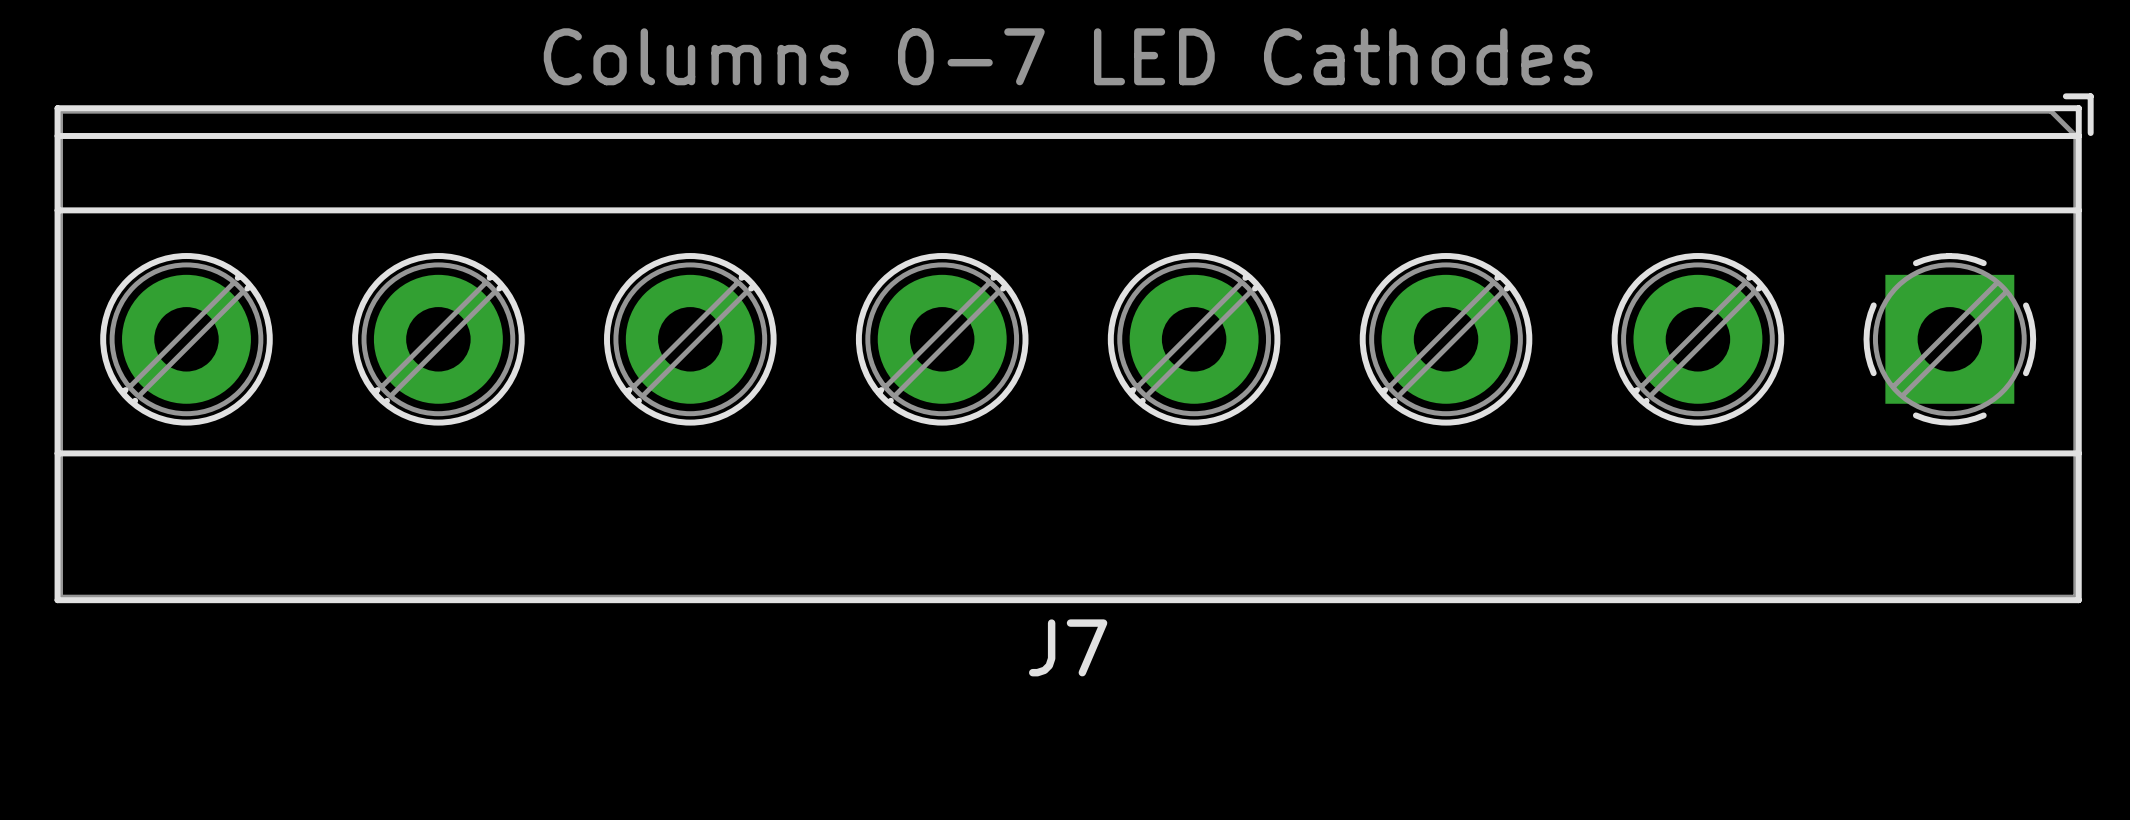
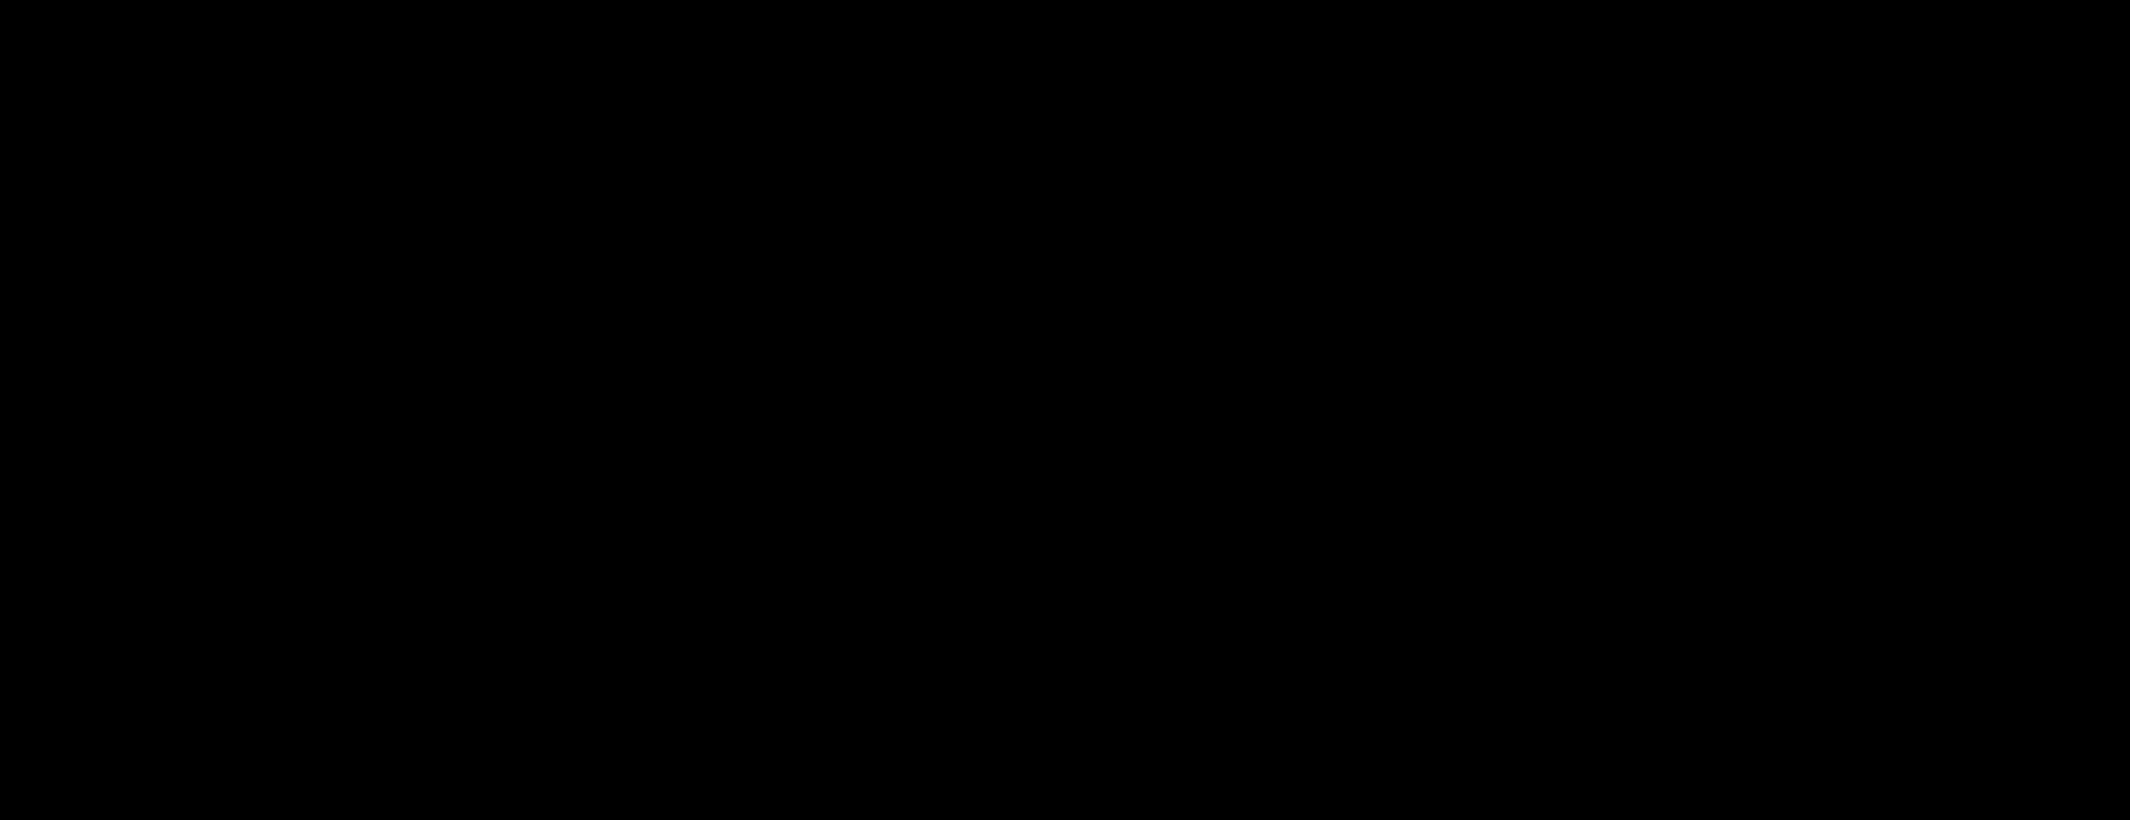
J7: Columns 0-7 LED Cathodes (1074, 348) -> none

